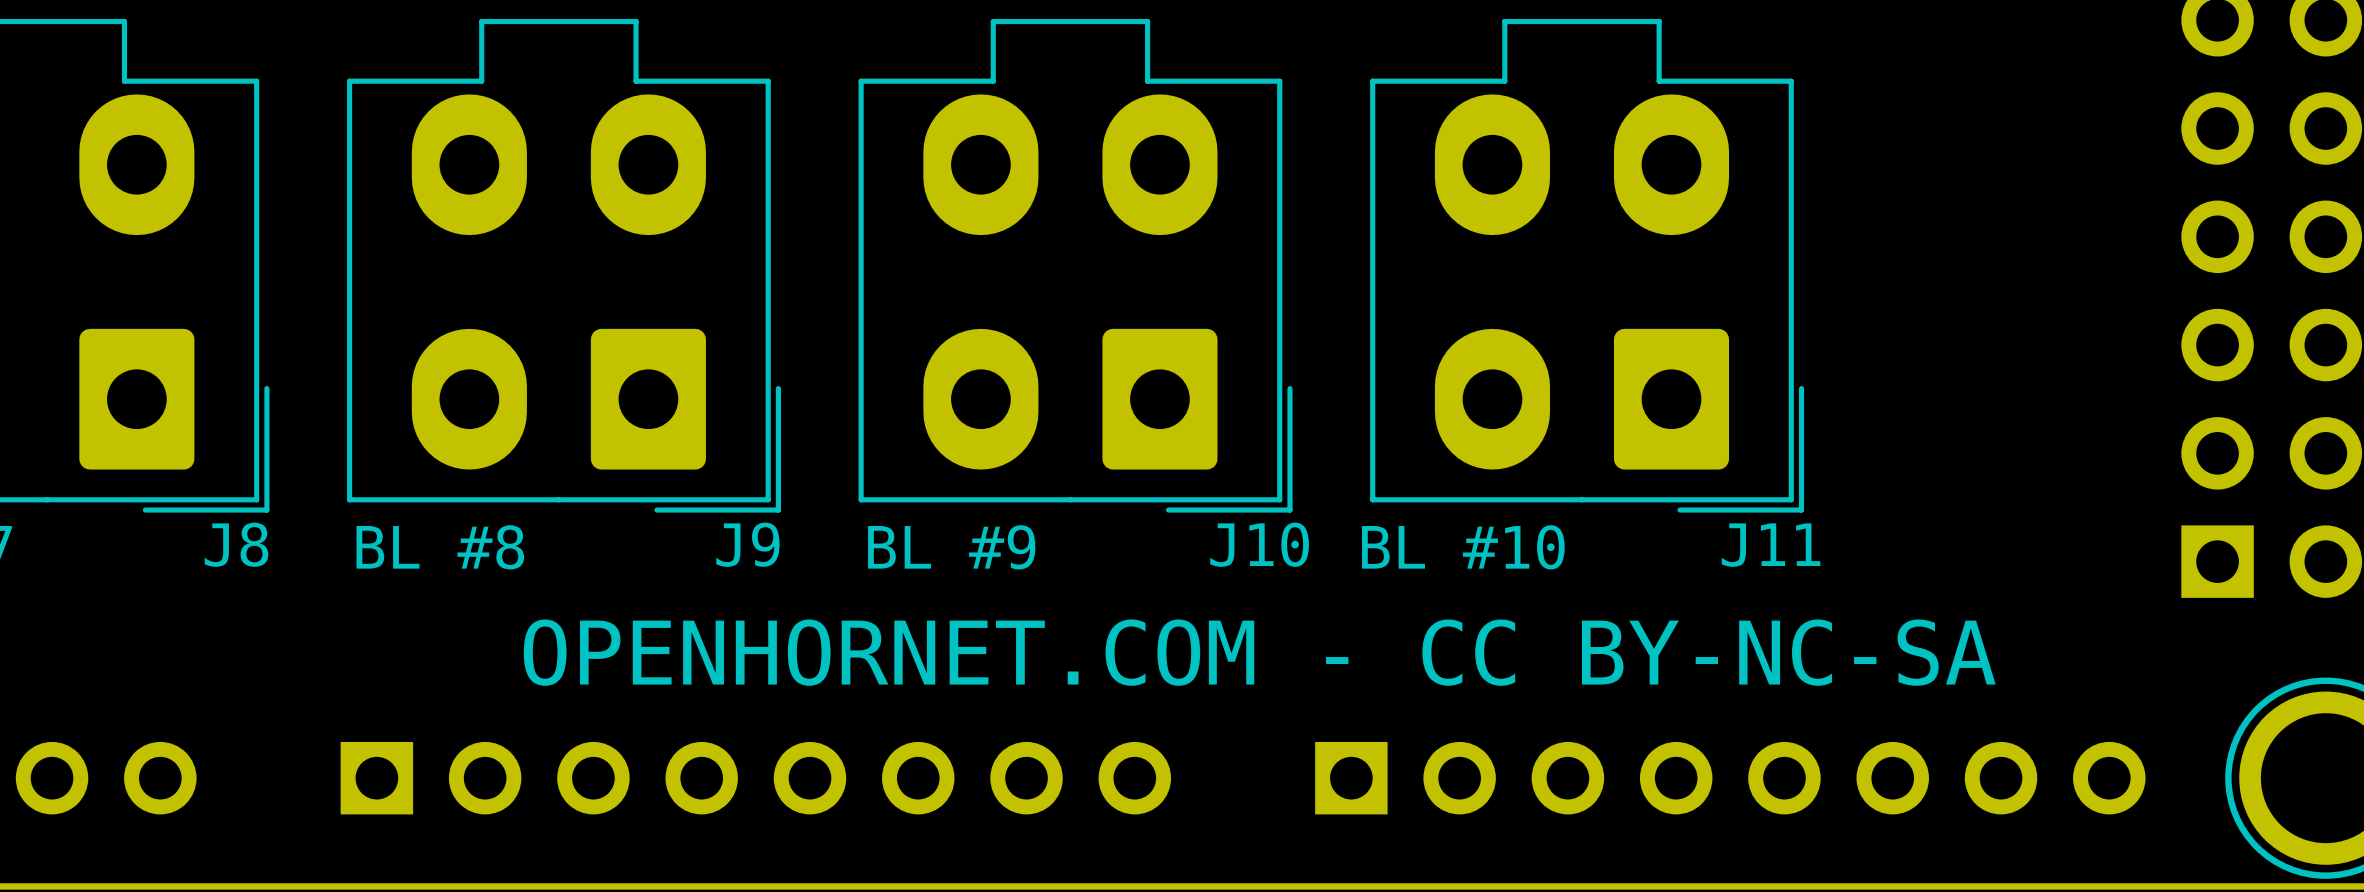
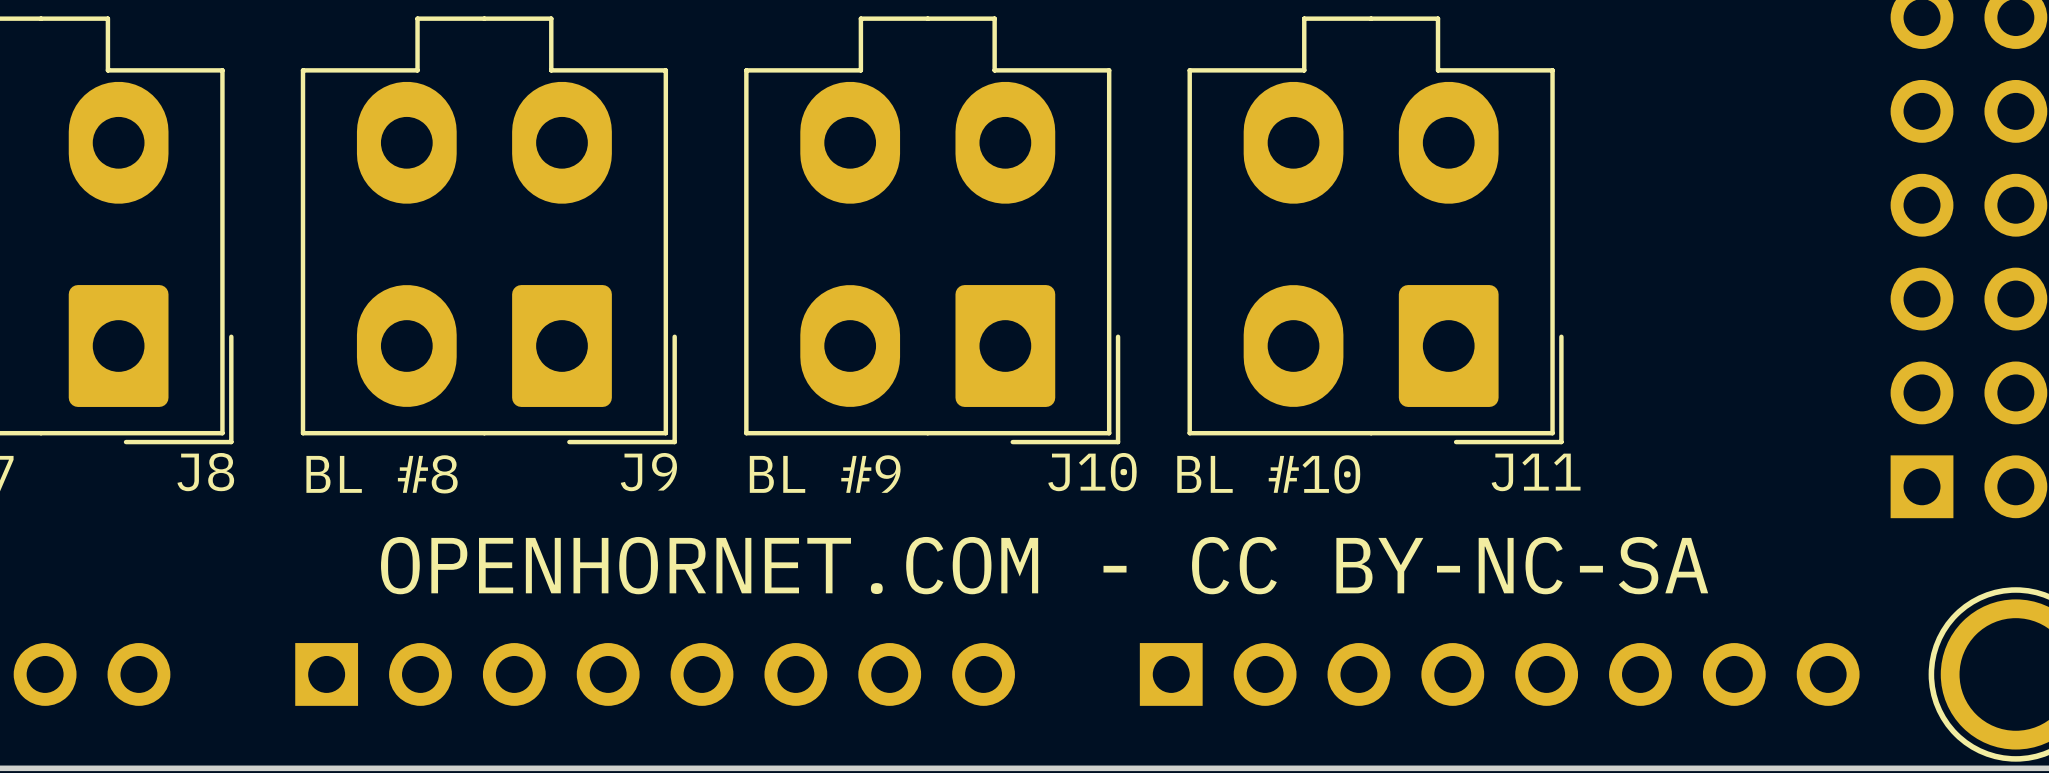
text position: OPENHORNET.COM - CC BY-NC-SA (1259, 652) -> OPENHORNET.COM - CC BY-NC-SA (1044, 565)

